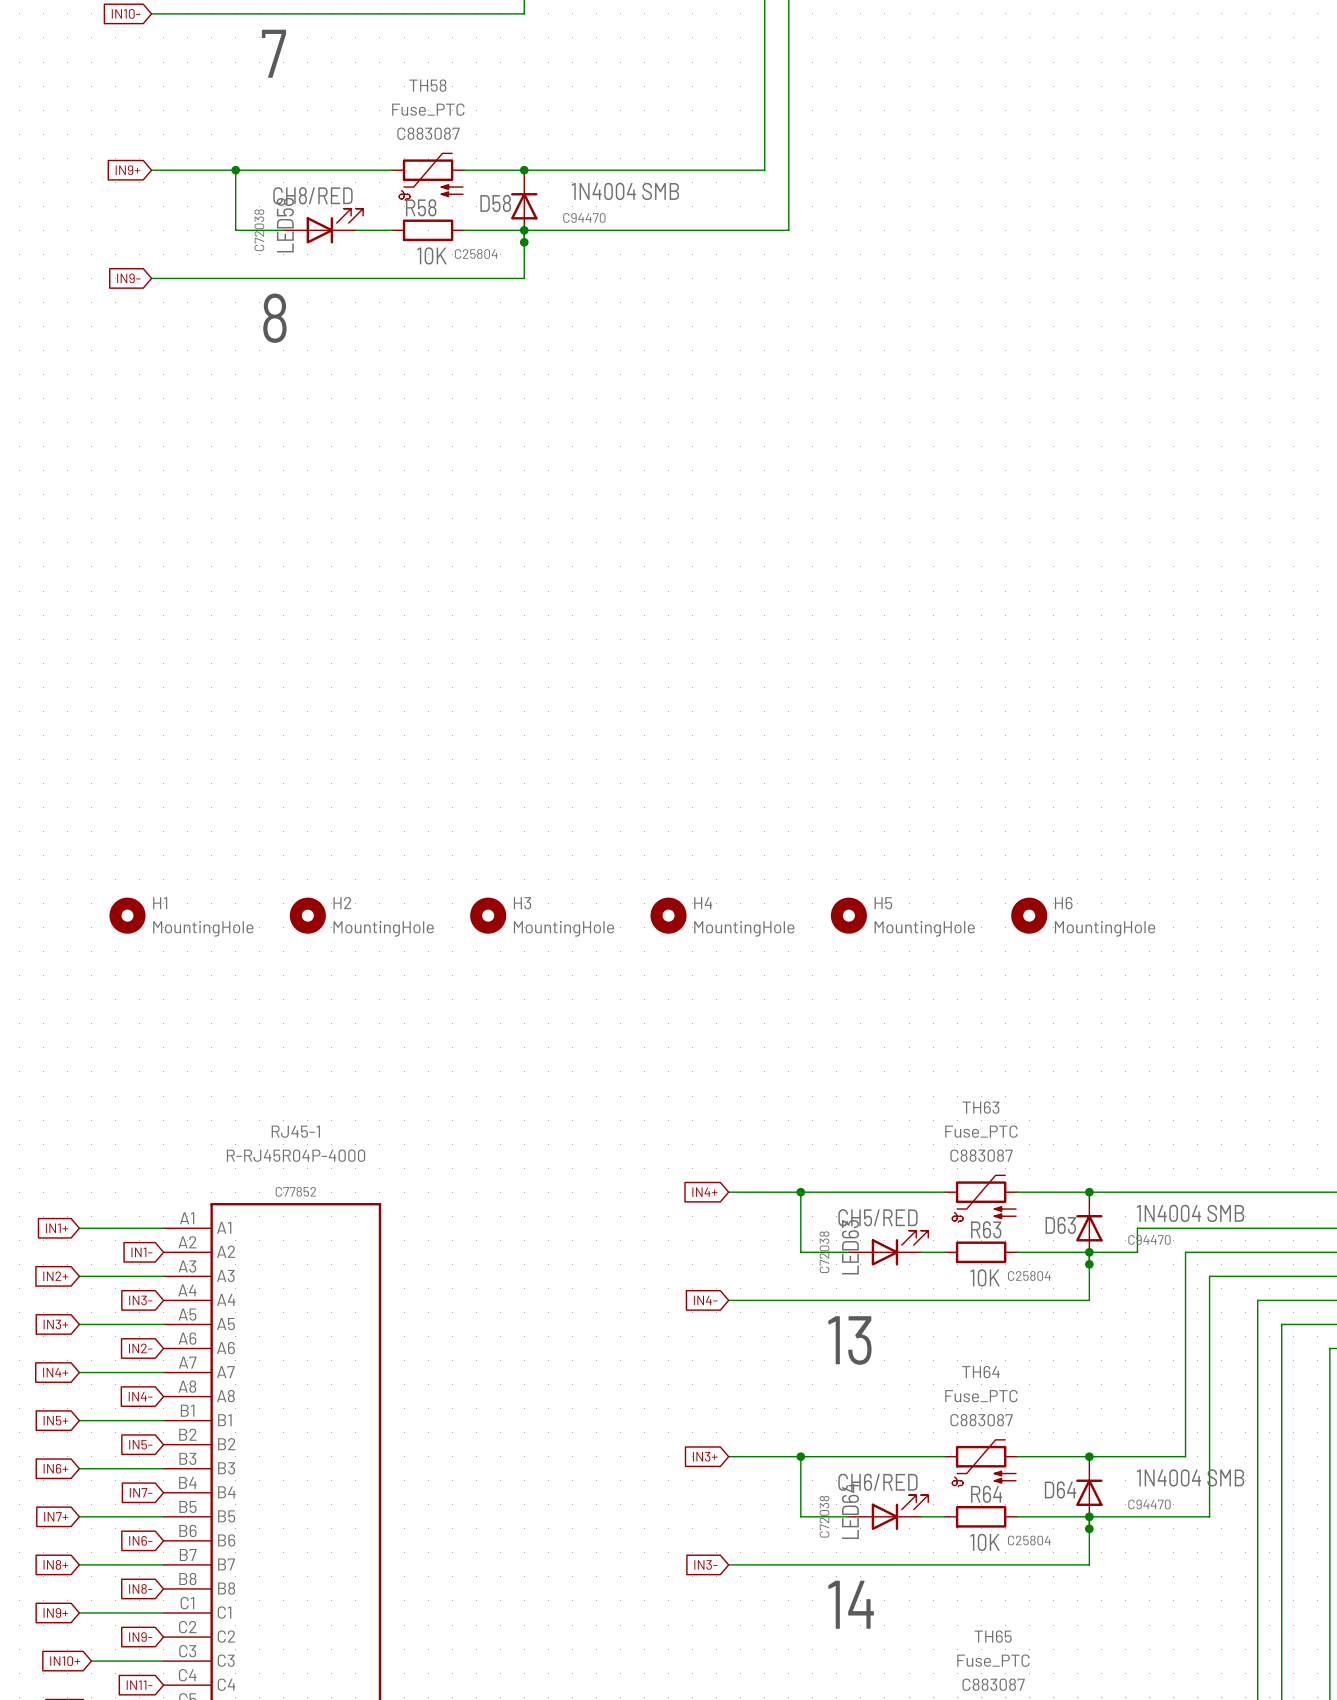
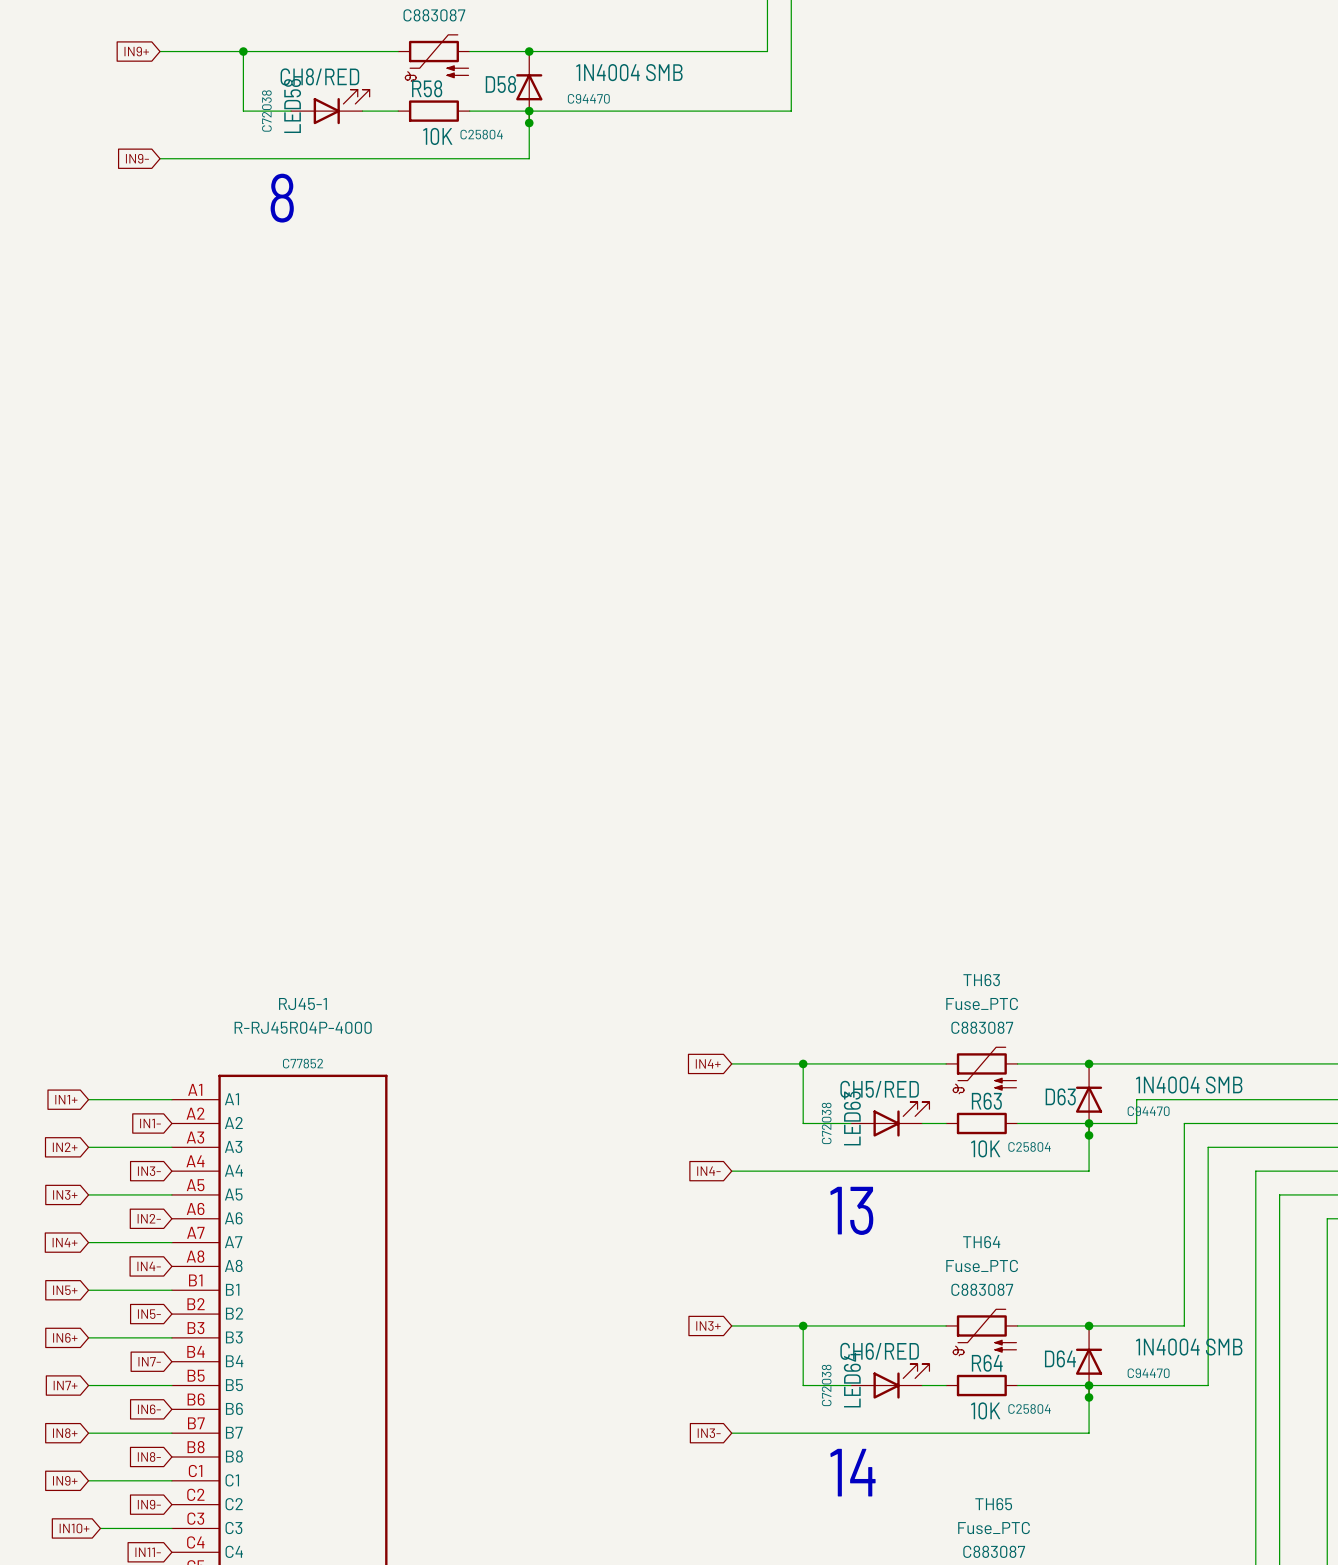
H1: MountingHole (127, 915) -> none
H2: MountingHole (307, 915) -> none
H3: MountingHole (488, 915) -> none
H4: MountingHole (668, 915) -> none
H5: MountingHole (848, 915) -> none
H6: MountingHole (1029, 915) -> none

